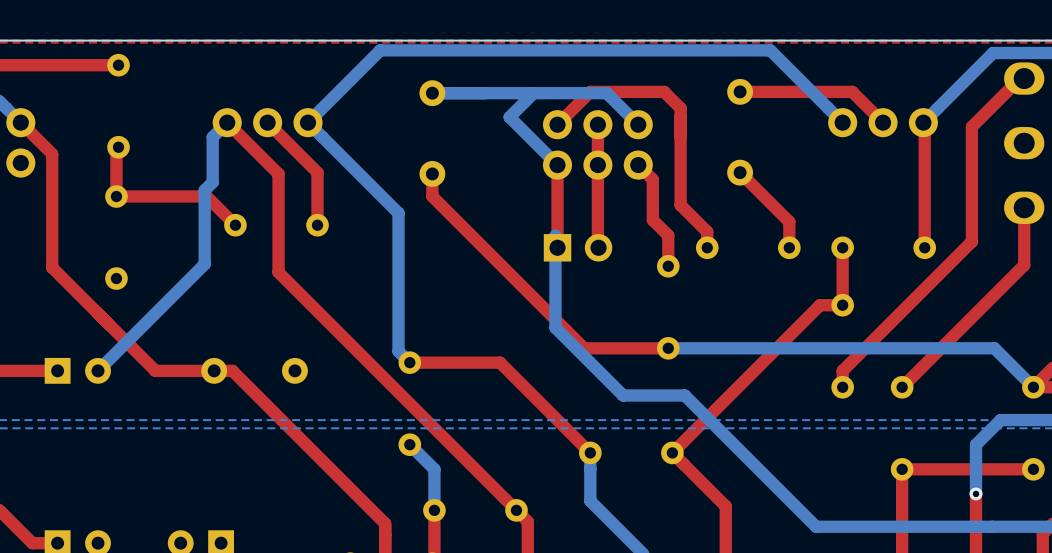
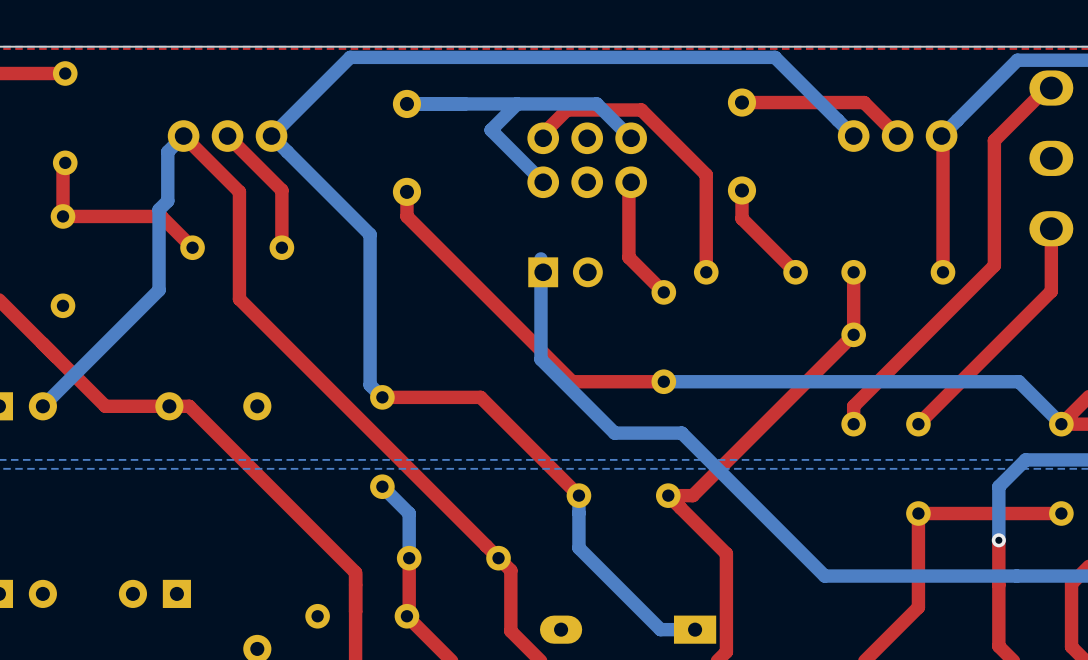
top track: (557, 124) (590, 91) (664, 91) (680, 108) (680, 205) (707, 231) -> (540, 136) (567, 110) (641, 110) (706, 174) (706, 254)
top track: (597, 124) (598, 247) -> none
top track: (557, 165) (557, 247) -> none
top track: (638, 165) (652, 179) (652, 220) (668, 235) (668, 266) -> (628, 180) (628, 257) (663, 292)
top track: (740, 172) (789, 221) (789, 247) -> (741, 190) (741, 218) (795, 272)
top track: (842, 305) (820, 305) (672, 452) -> (853, 334) (692, 495) (668, 495)

